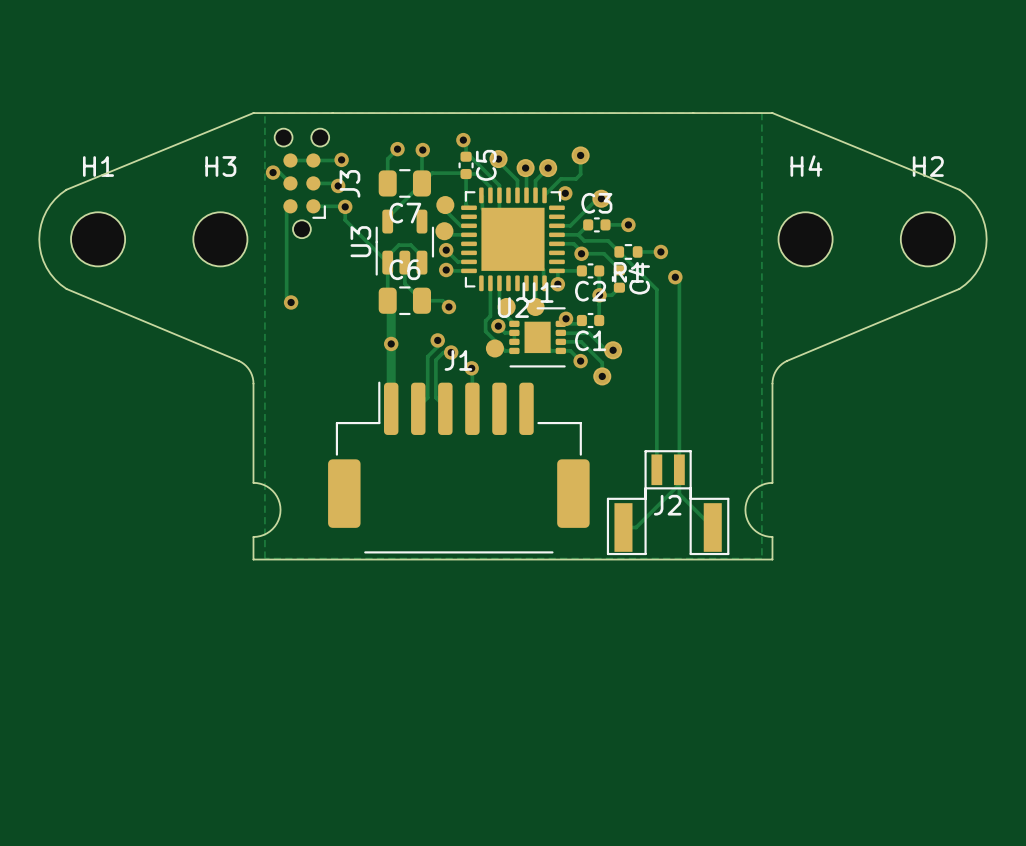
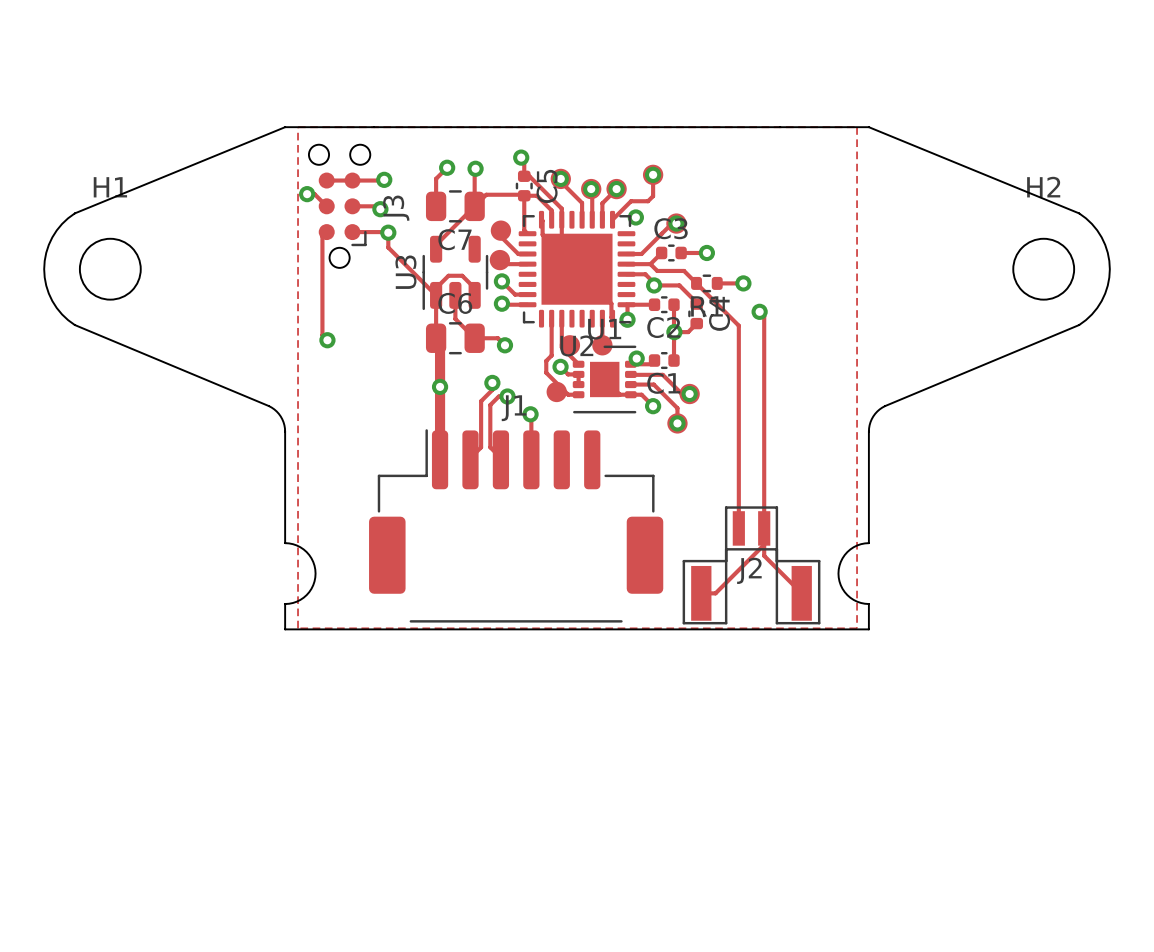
H3: (220, 239) -> none
H4: (805, 239) -> none

